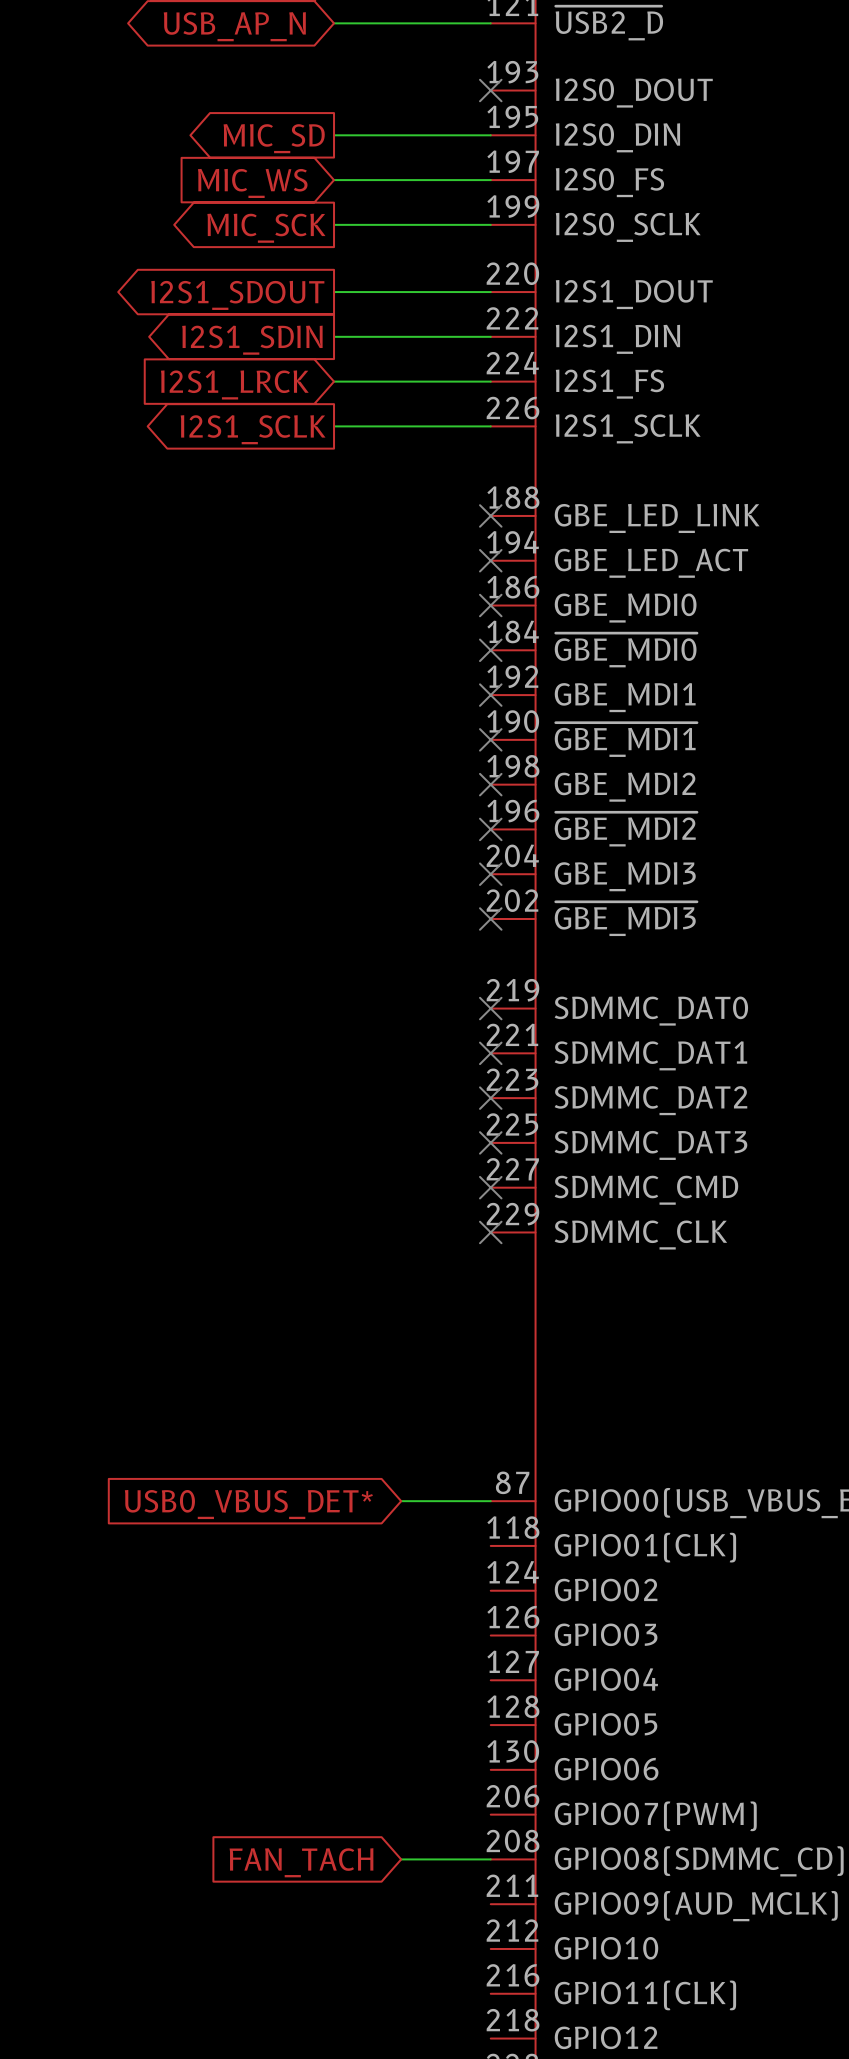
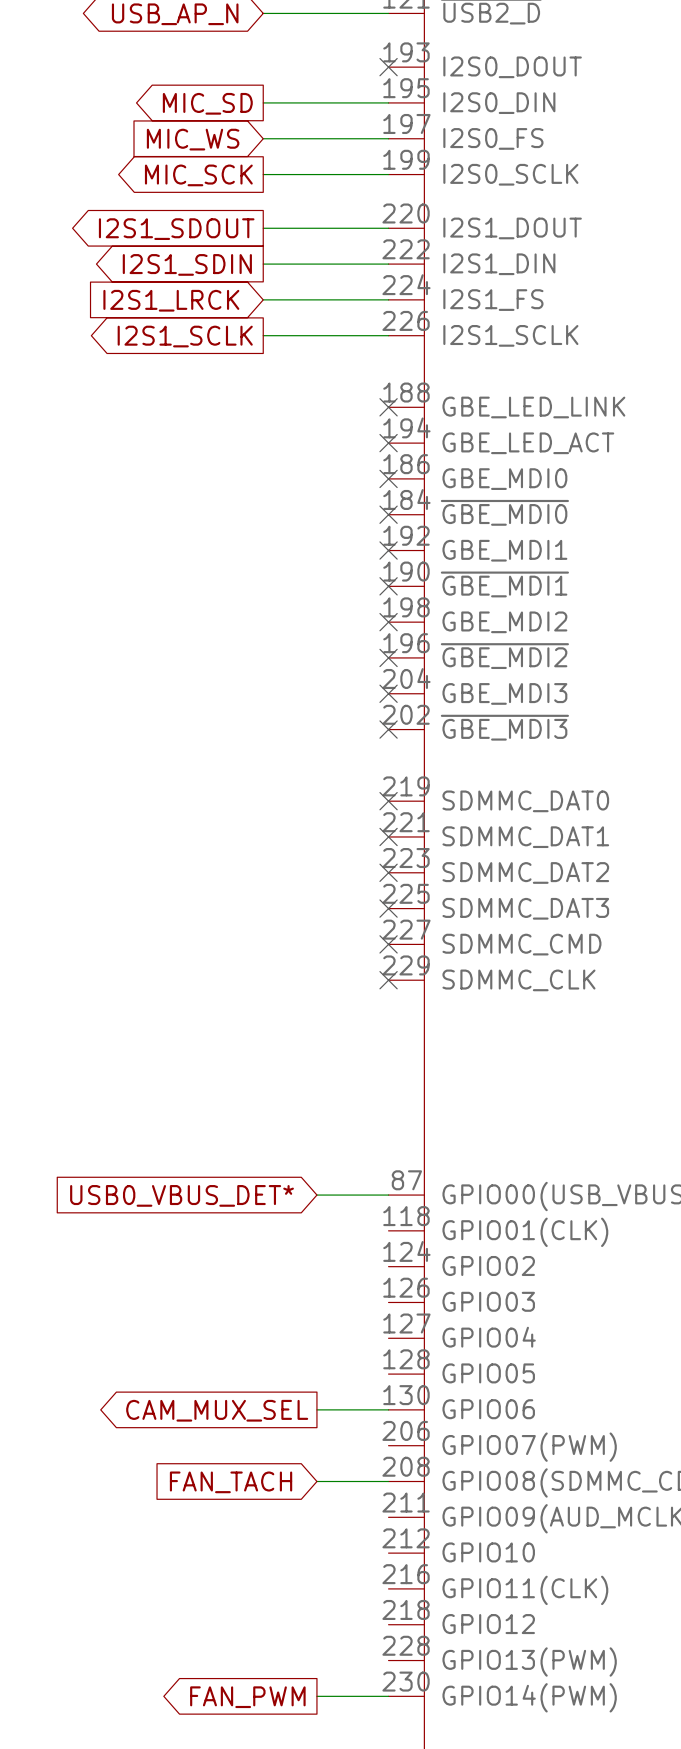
wire: none -> (316, 1409) (388, 1409)
global label: none -> CAM_MUX_SEL (217, 1410)

